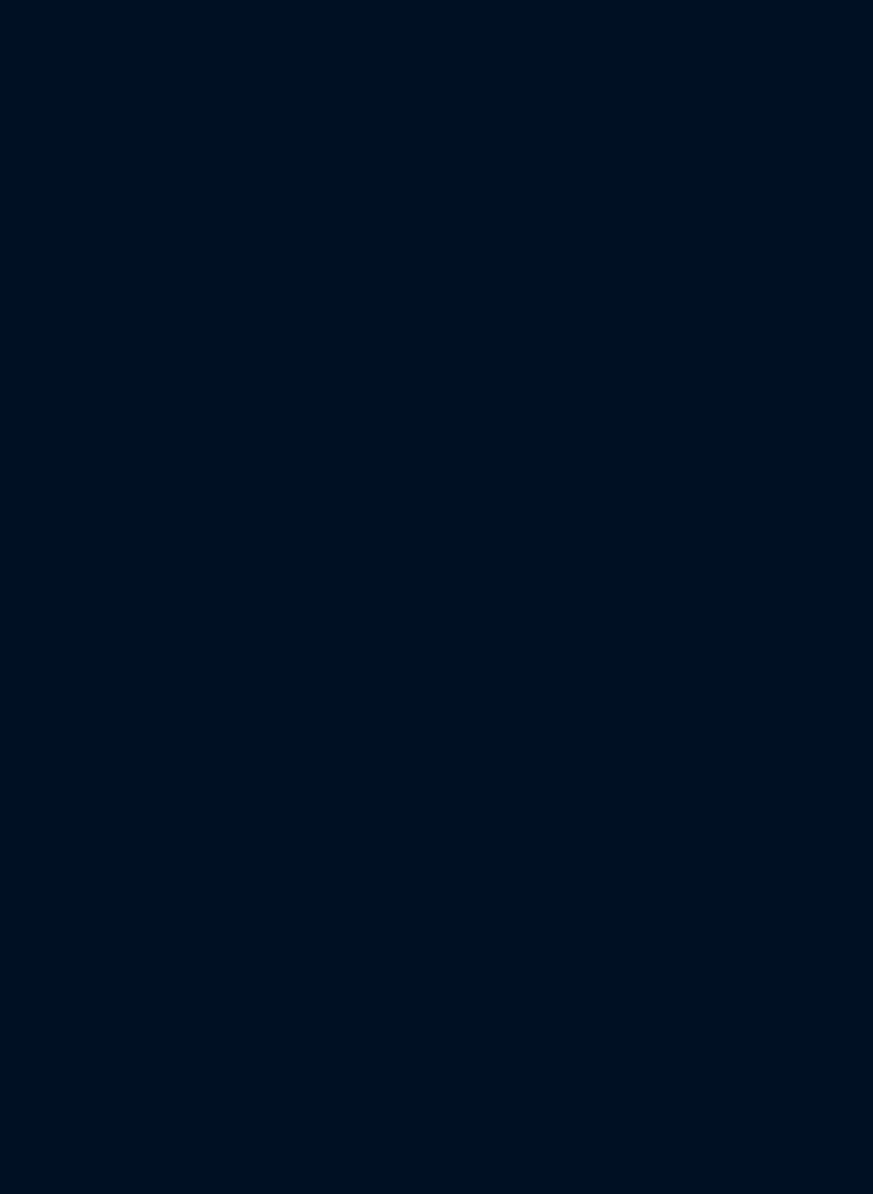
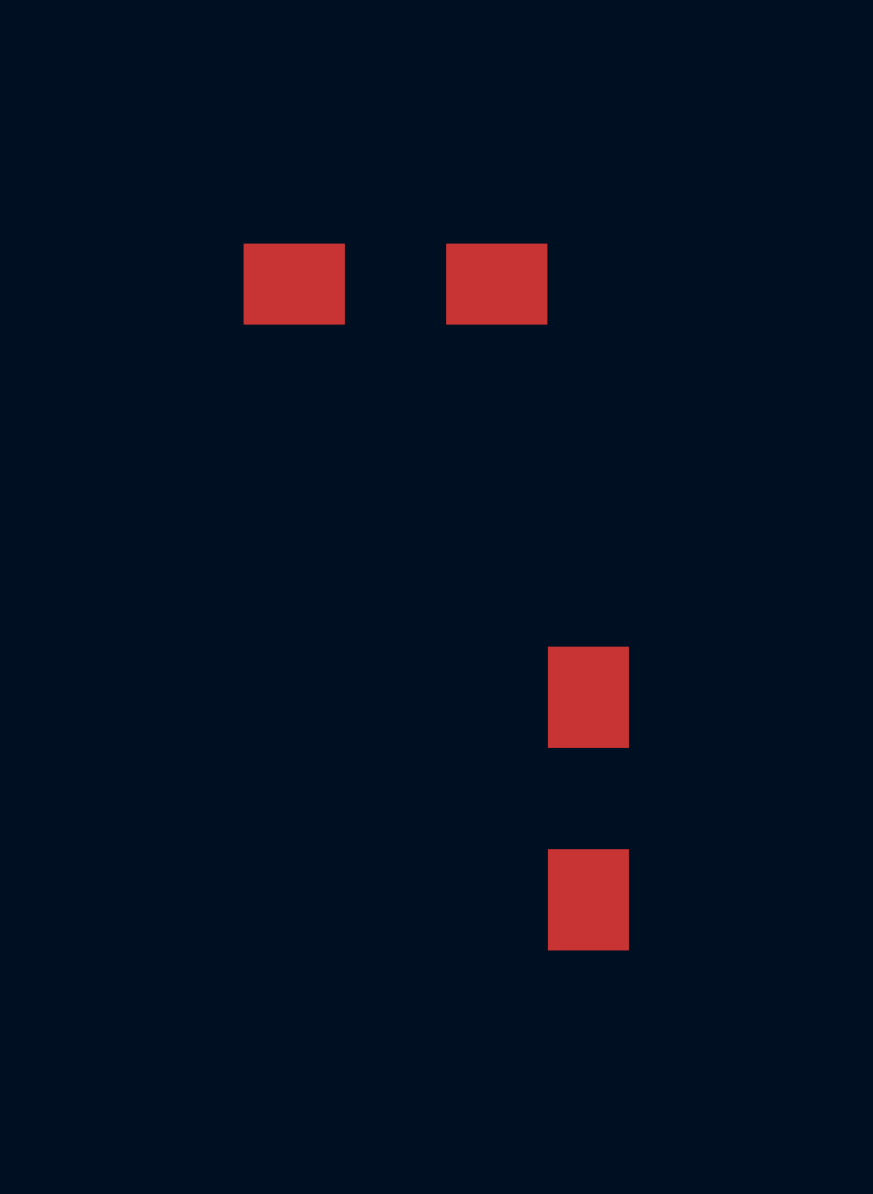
part: none -> (395, 284)
part: none -> (588, 798)

